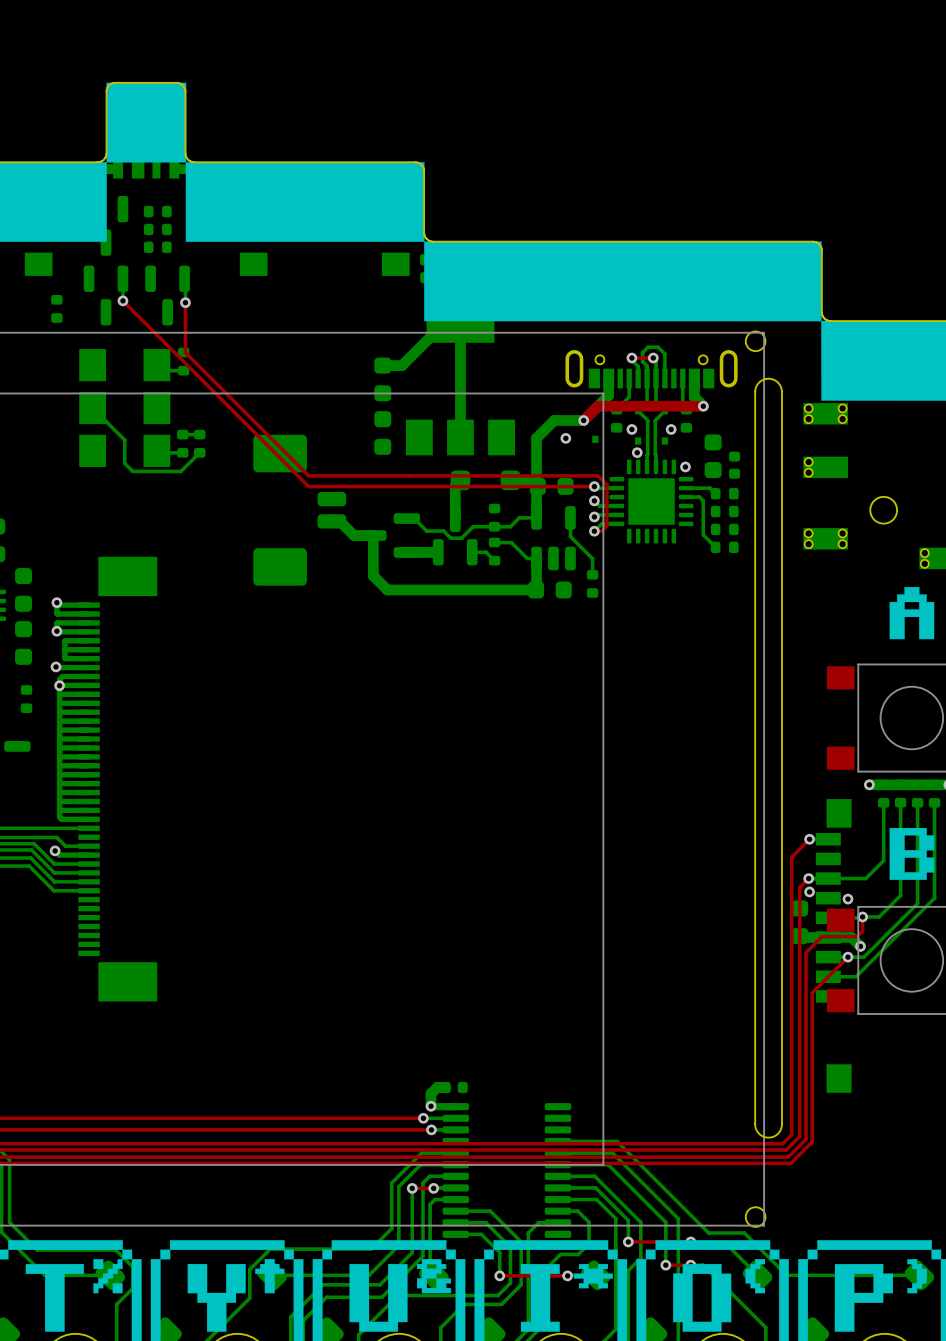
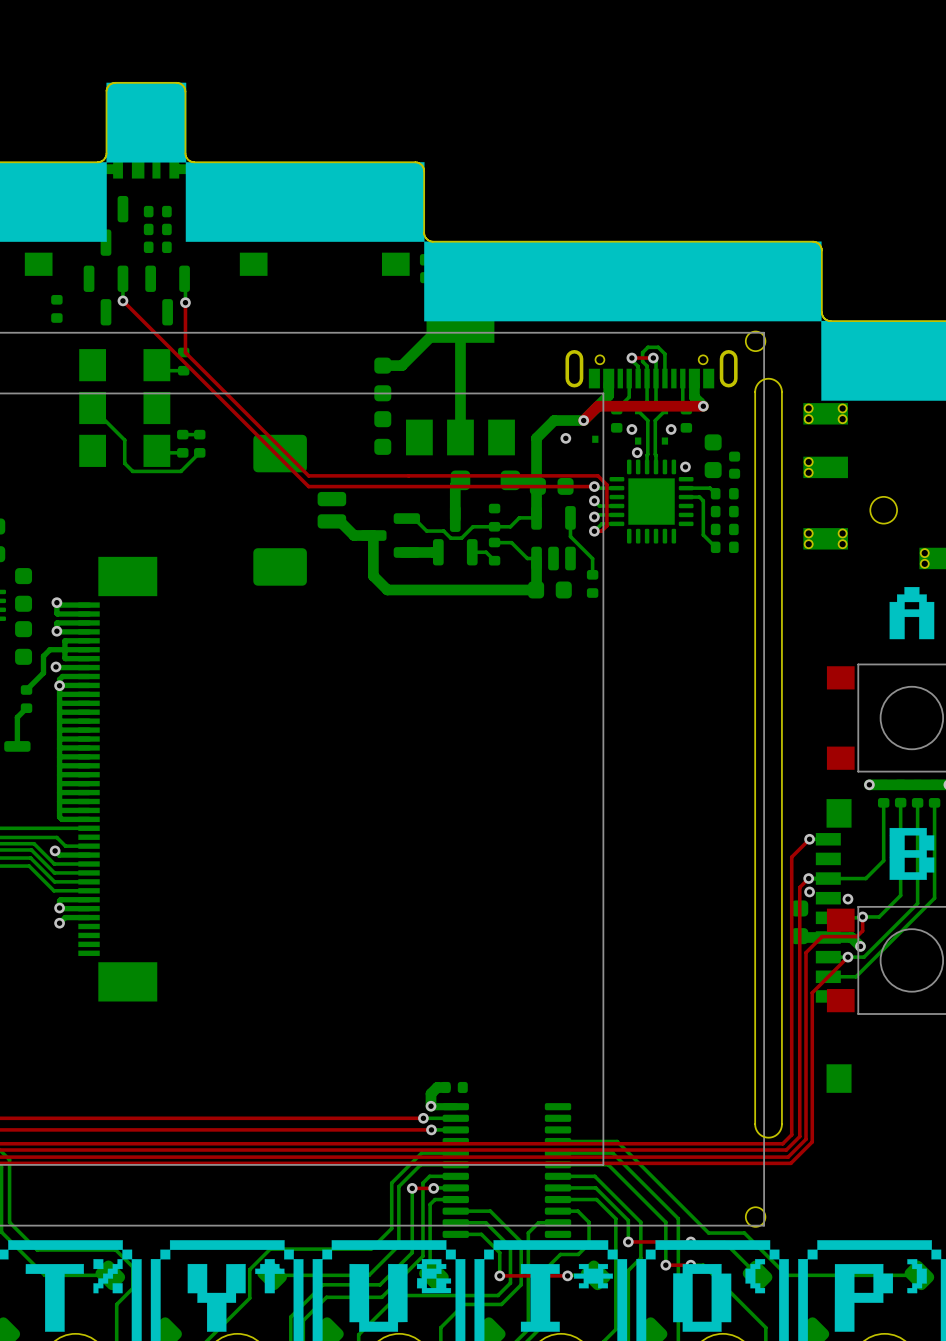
bottom track: none -> (65, 649) (50, 649) (43, 656) (43, 673) (26, 689)
bottom track: none -> (26, 708) (17, 717) (17, 746)
bottom track: none -> (89, 899) (59, 900) (60, 908) (89, 908)
via: none -> (59, 908)
bottom track: none -> (89, 917) (65, 917) (59, 923)
via: none -> (59, 923)

